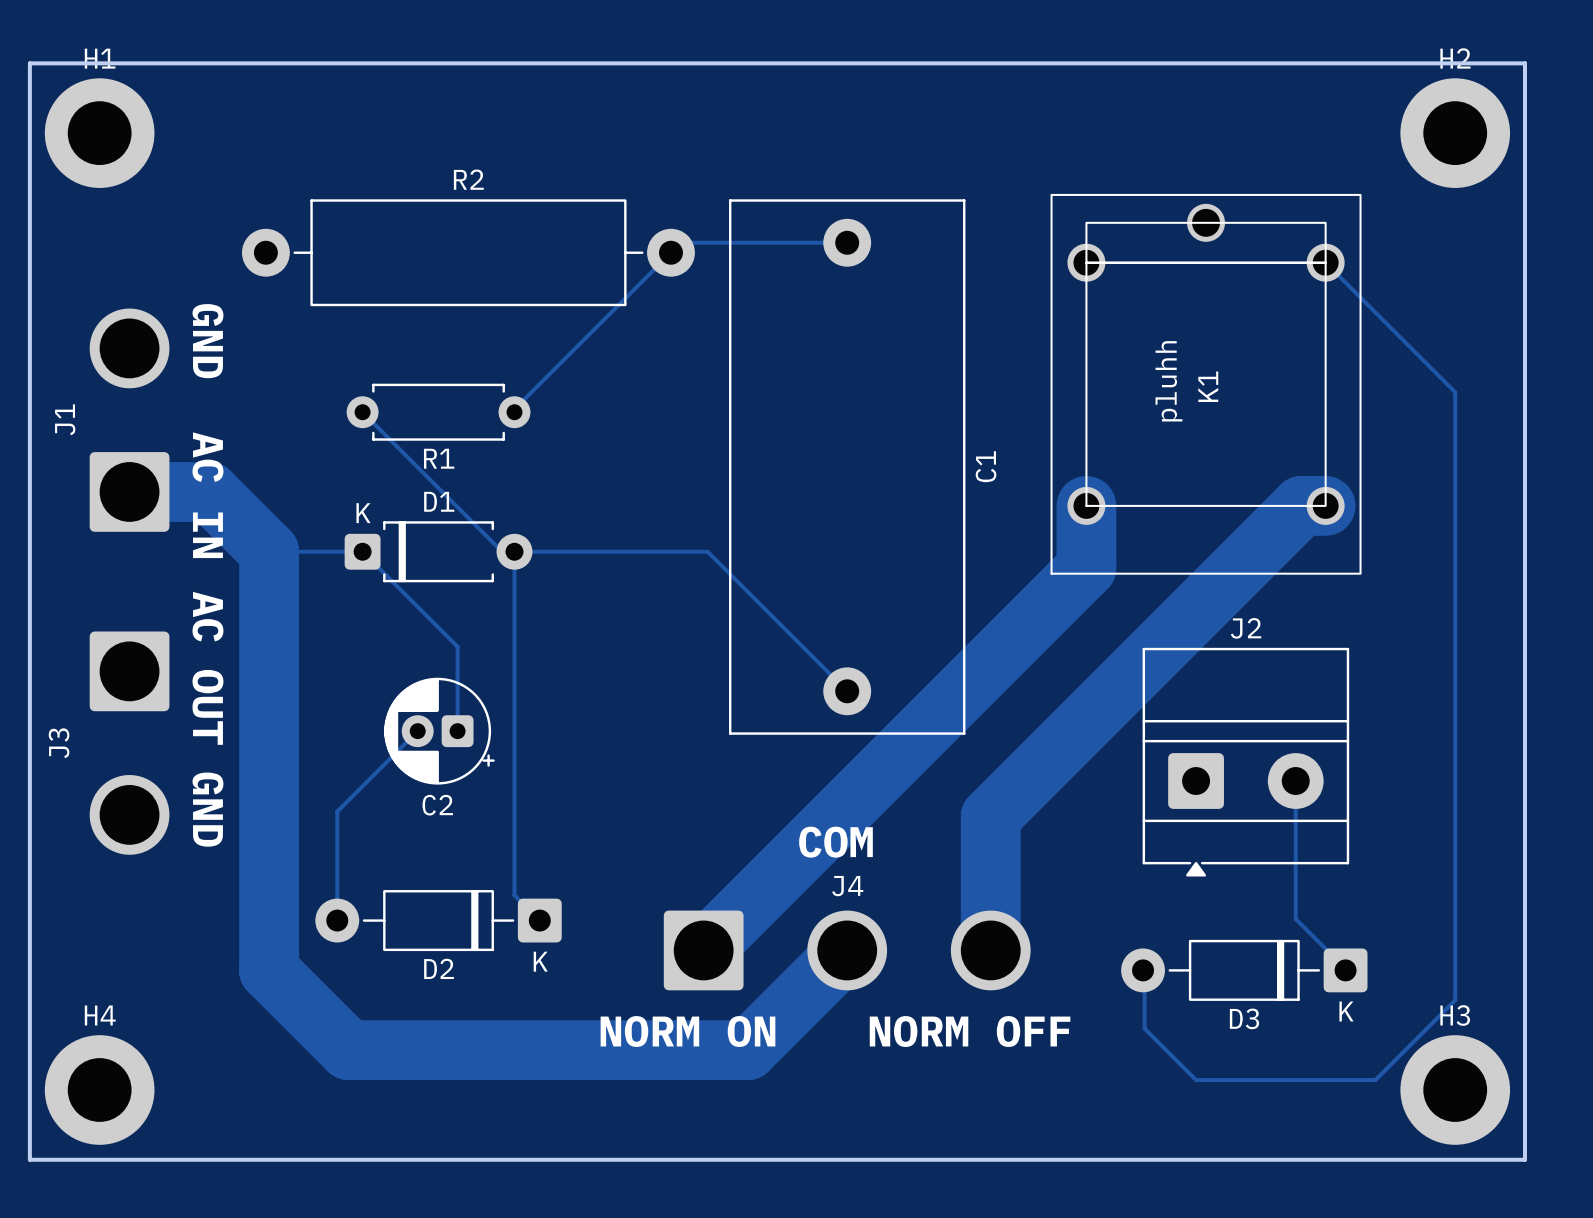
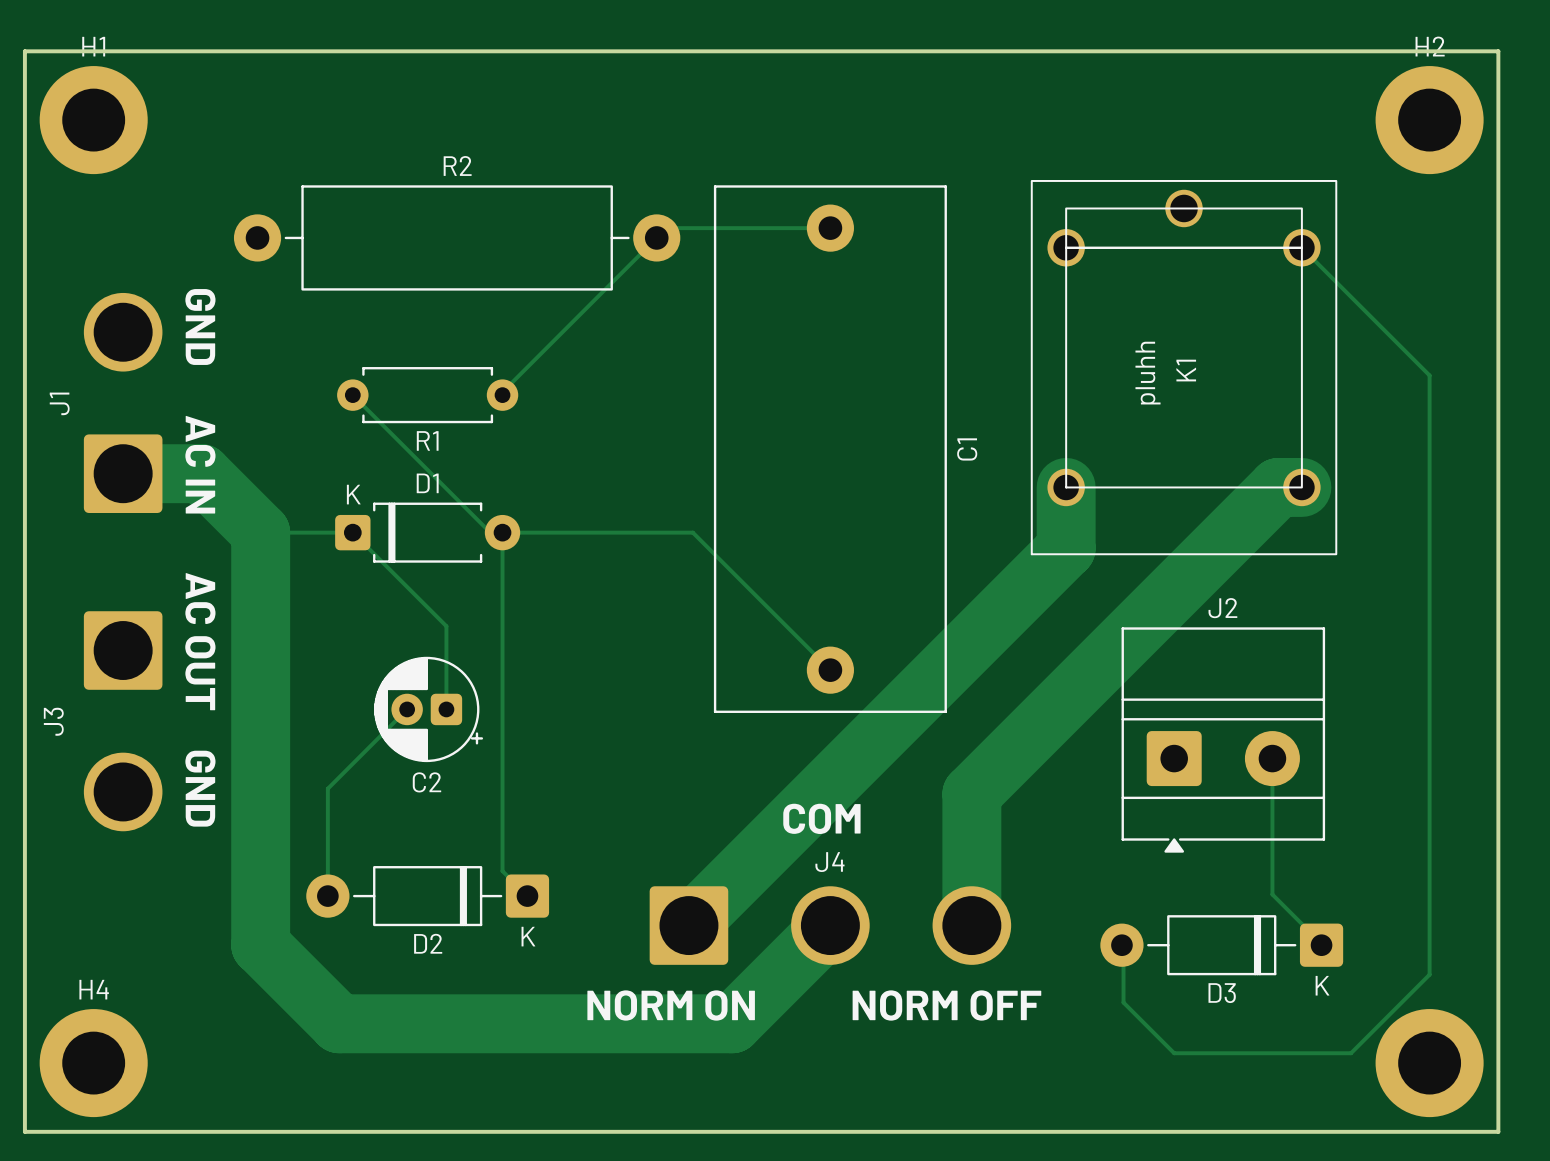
H3 name: H3 (1455, 1015) -> none

